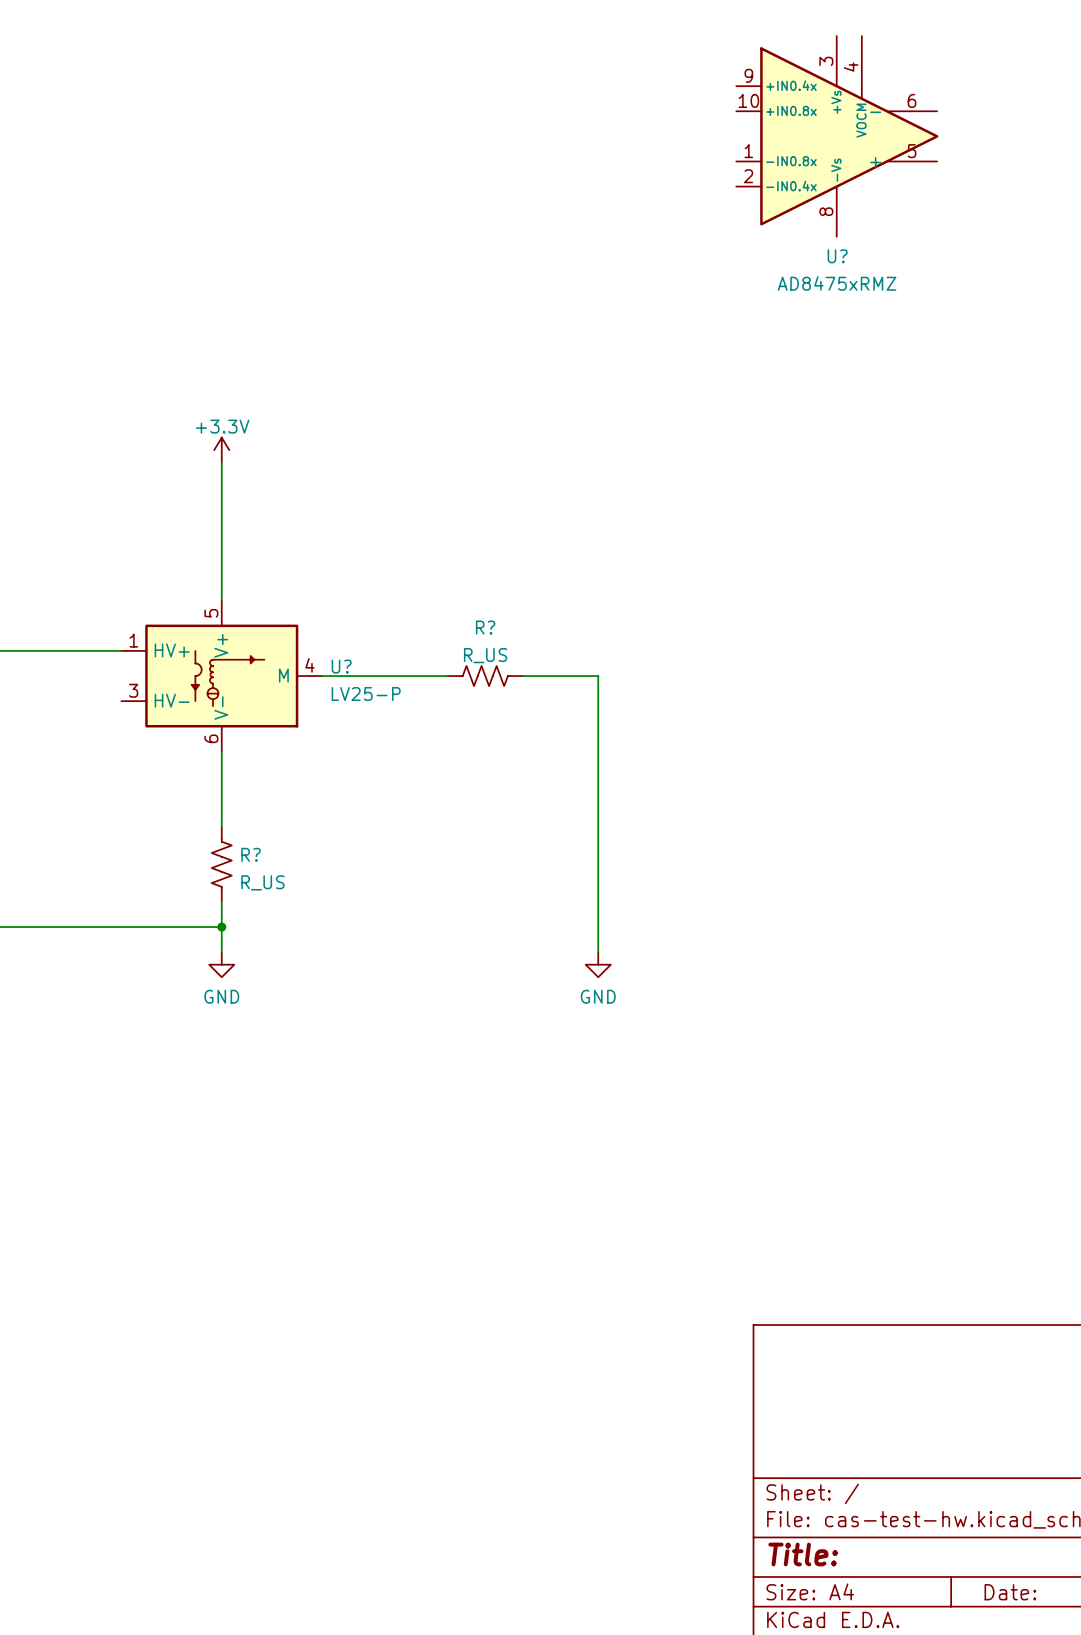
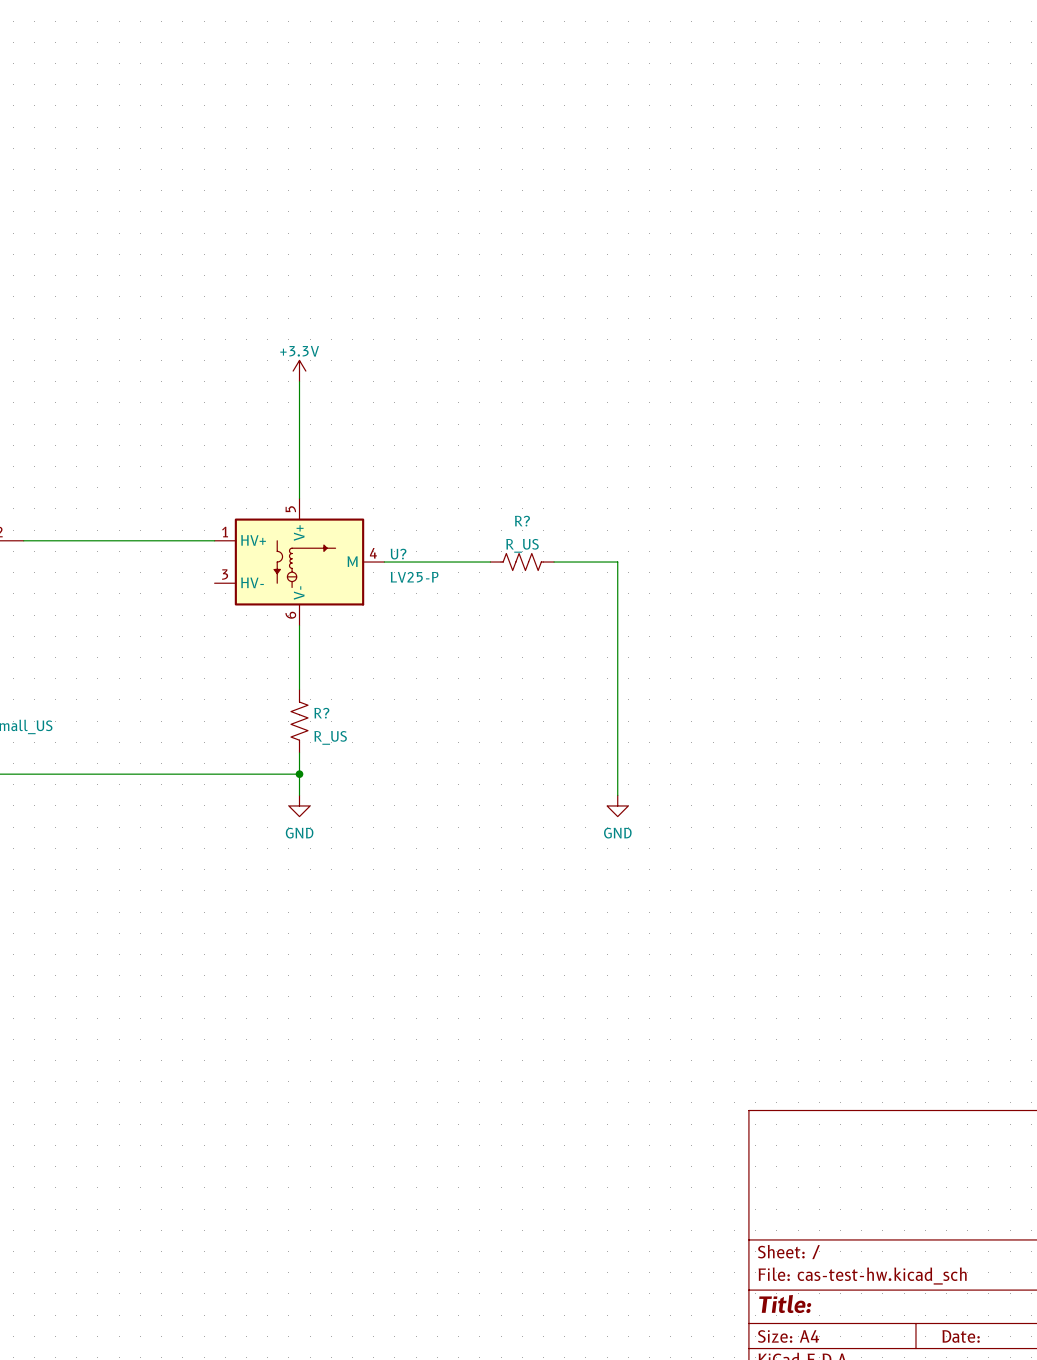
U?: AD8475xRMZ (837, 136) -> none

